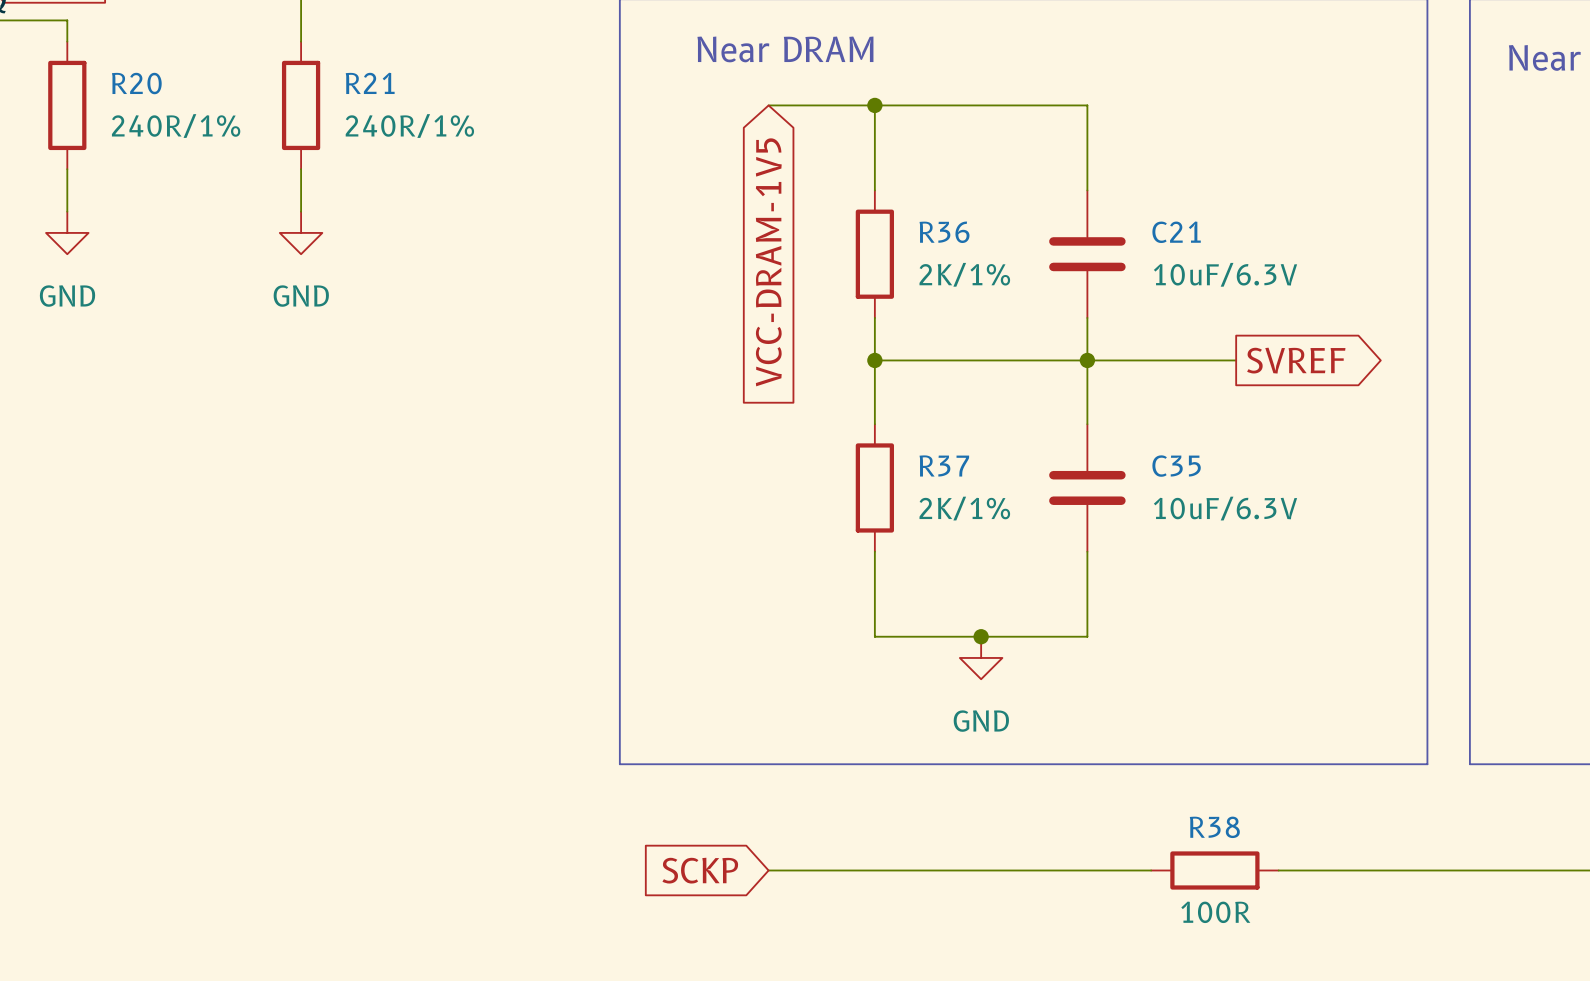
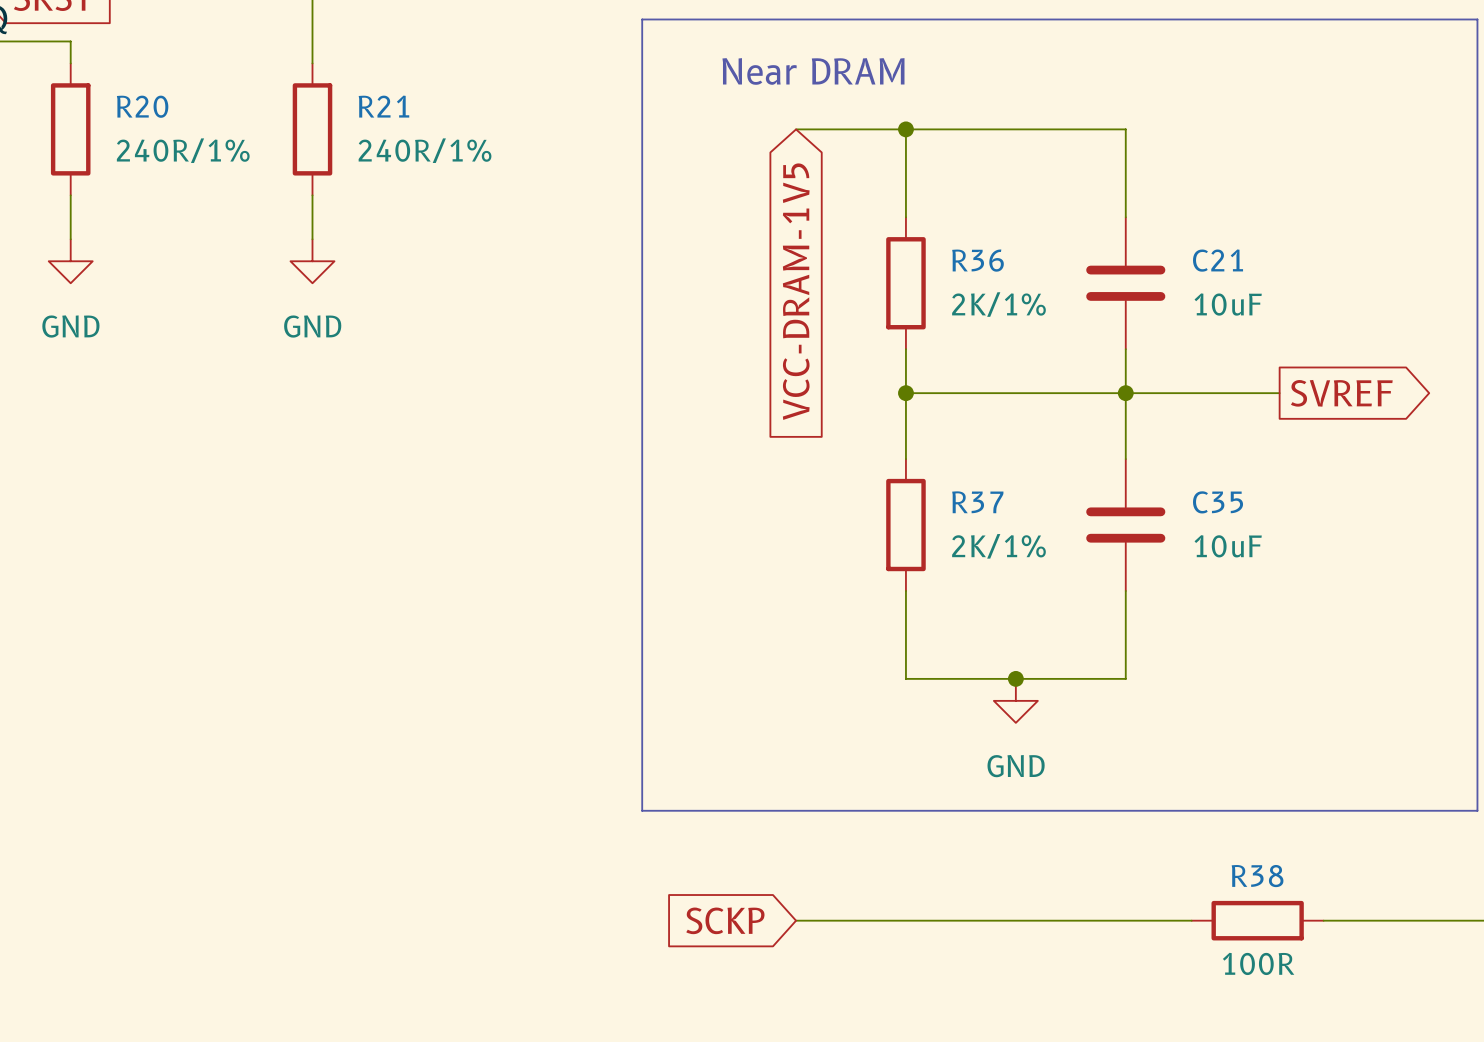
C21 value: 10uF/6.3V (1225, 274) -> 10uF (1228, 304)
C35 value: 10uF/6.3V (1225, 508) -> 10uF (1228, 546)

